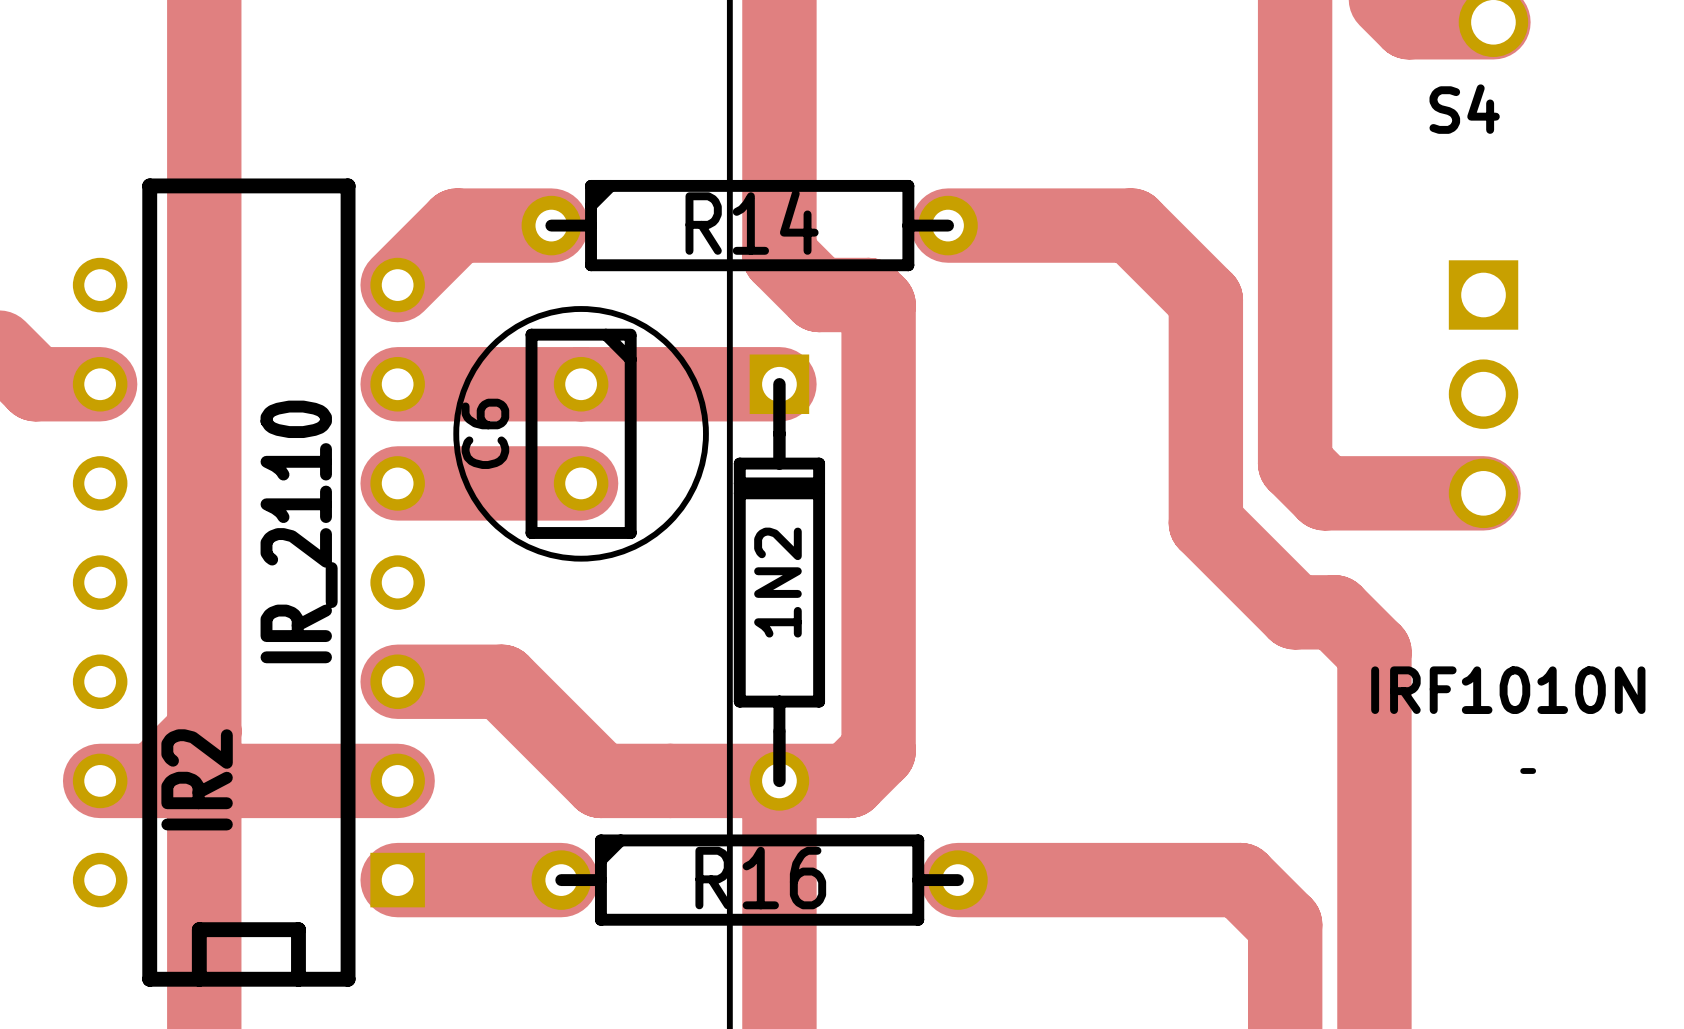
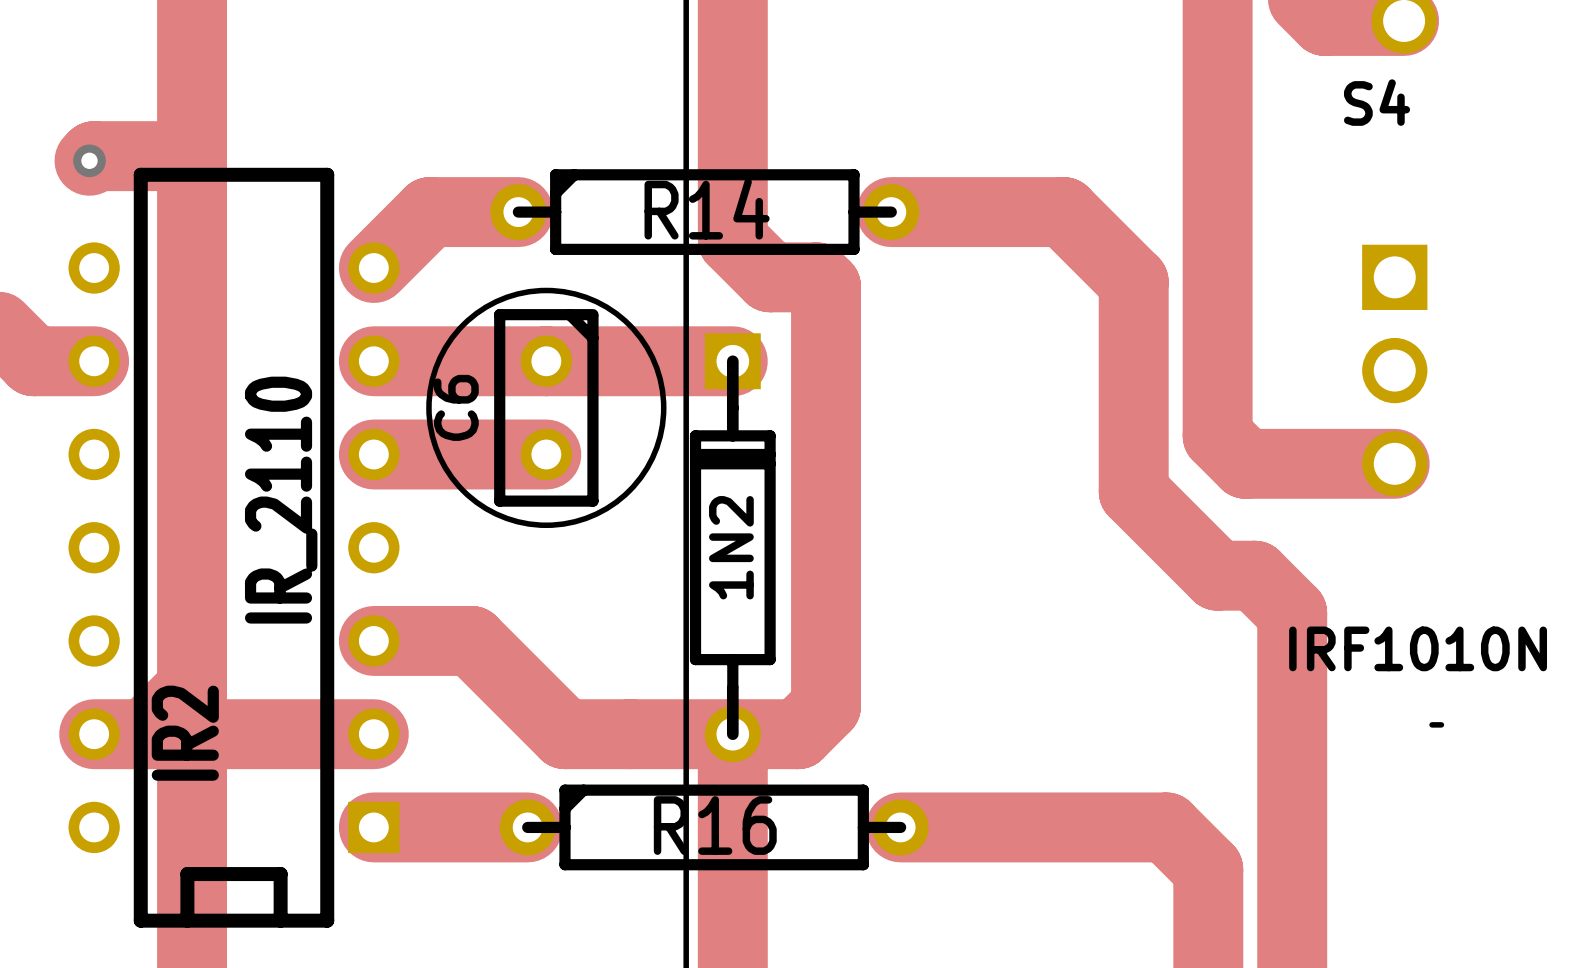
track: none -> (192, 156) (94, 156) (89, 160)
via: none -> (89, 160)

